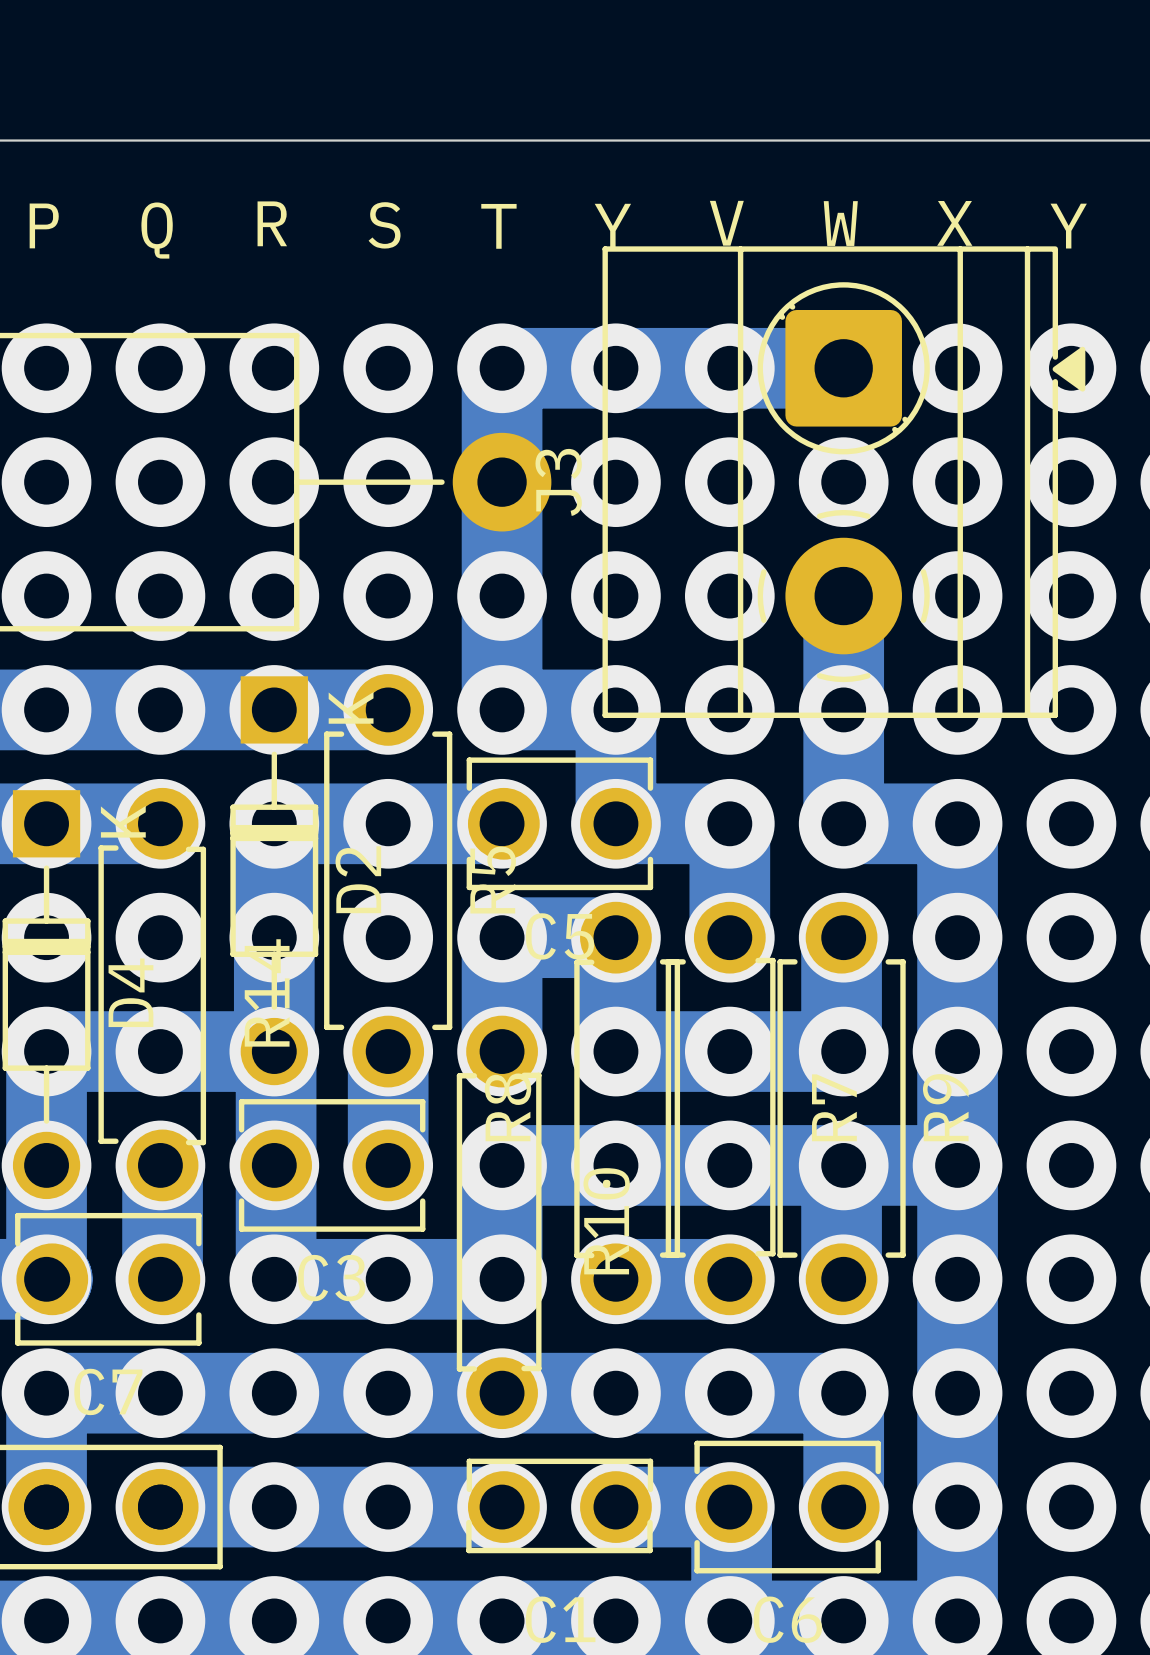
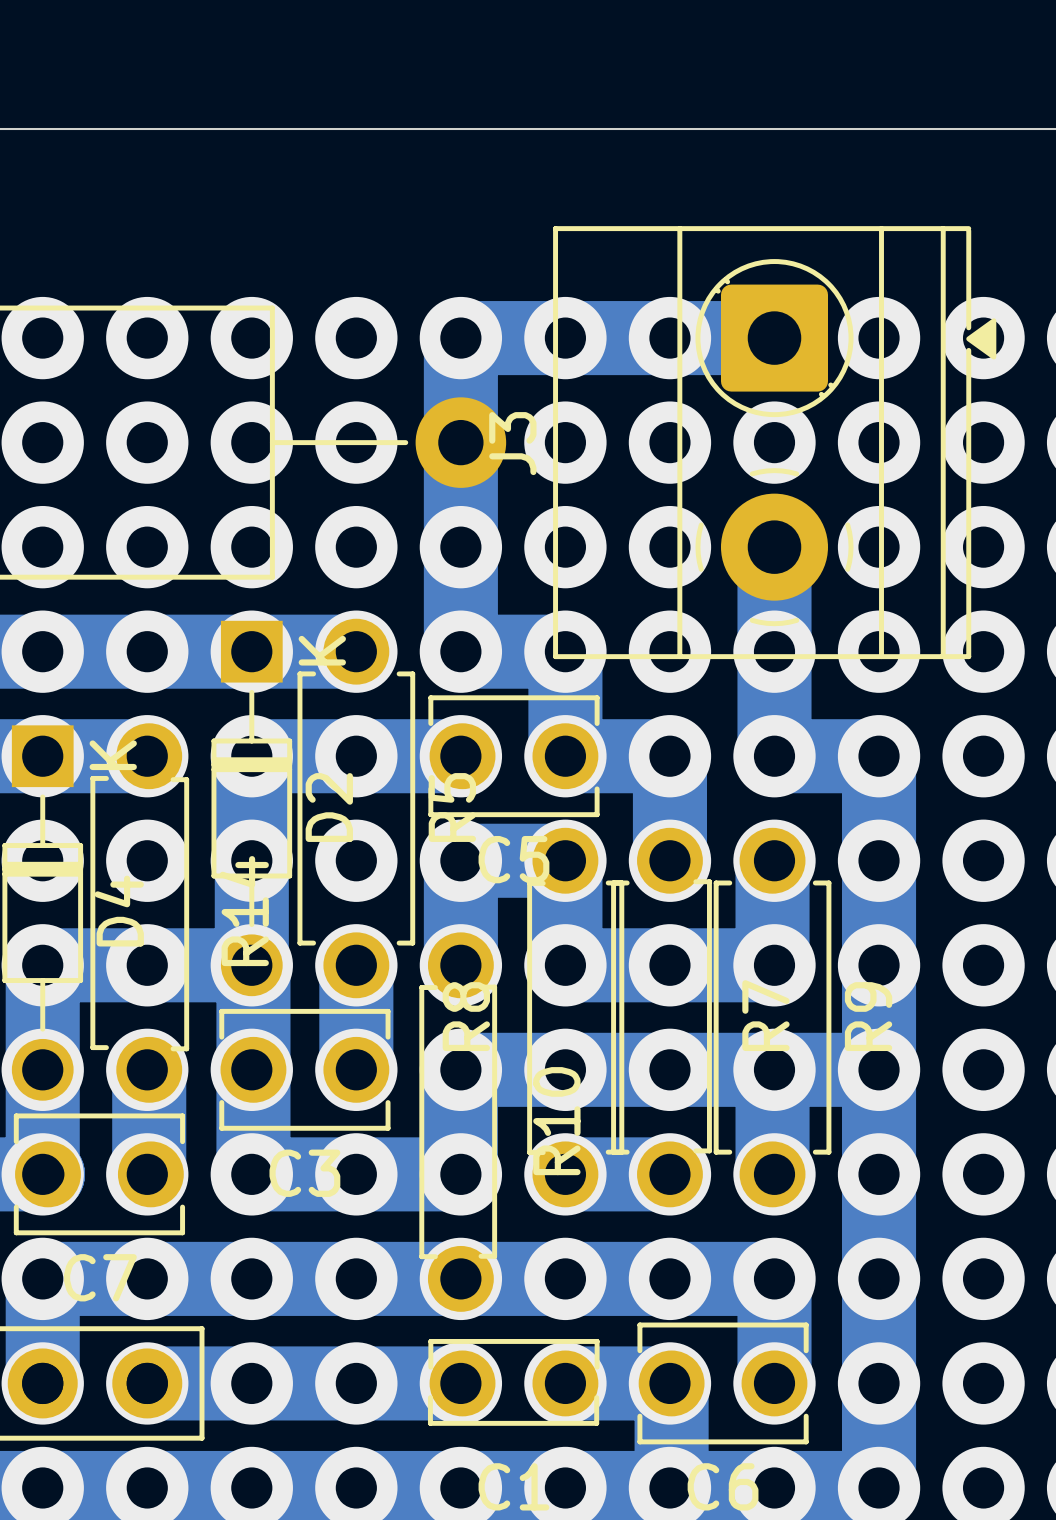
text: R (272, 223) -> none
text: V (726, 223) -> none
text: W (840, 223) -> none
text: X (954, 223) -> none
text: P (44, 225) -> none
text: S (384, 225) -> none
text: T (498, 226) -> none
text: Y (612, 226) -> none
text: Y (1068, 226) -> none
text: Q (157, 230) -> none

